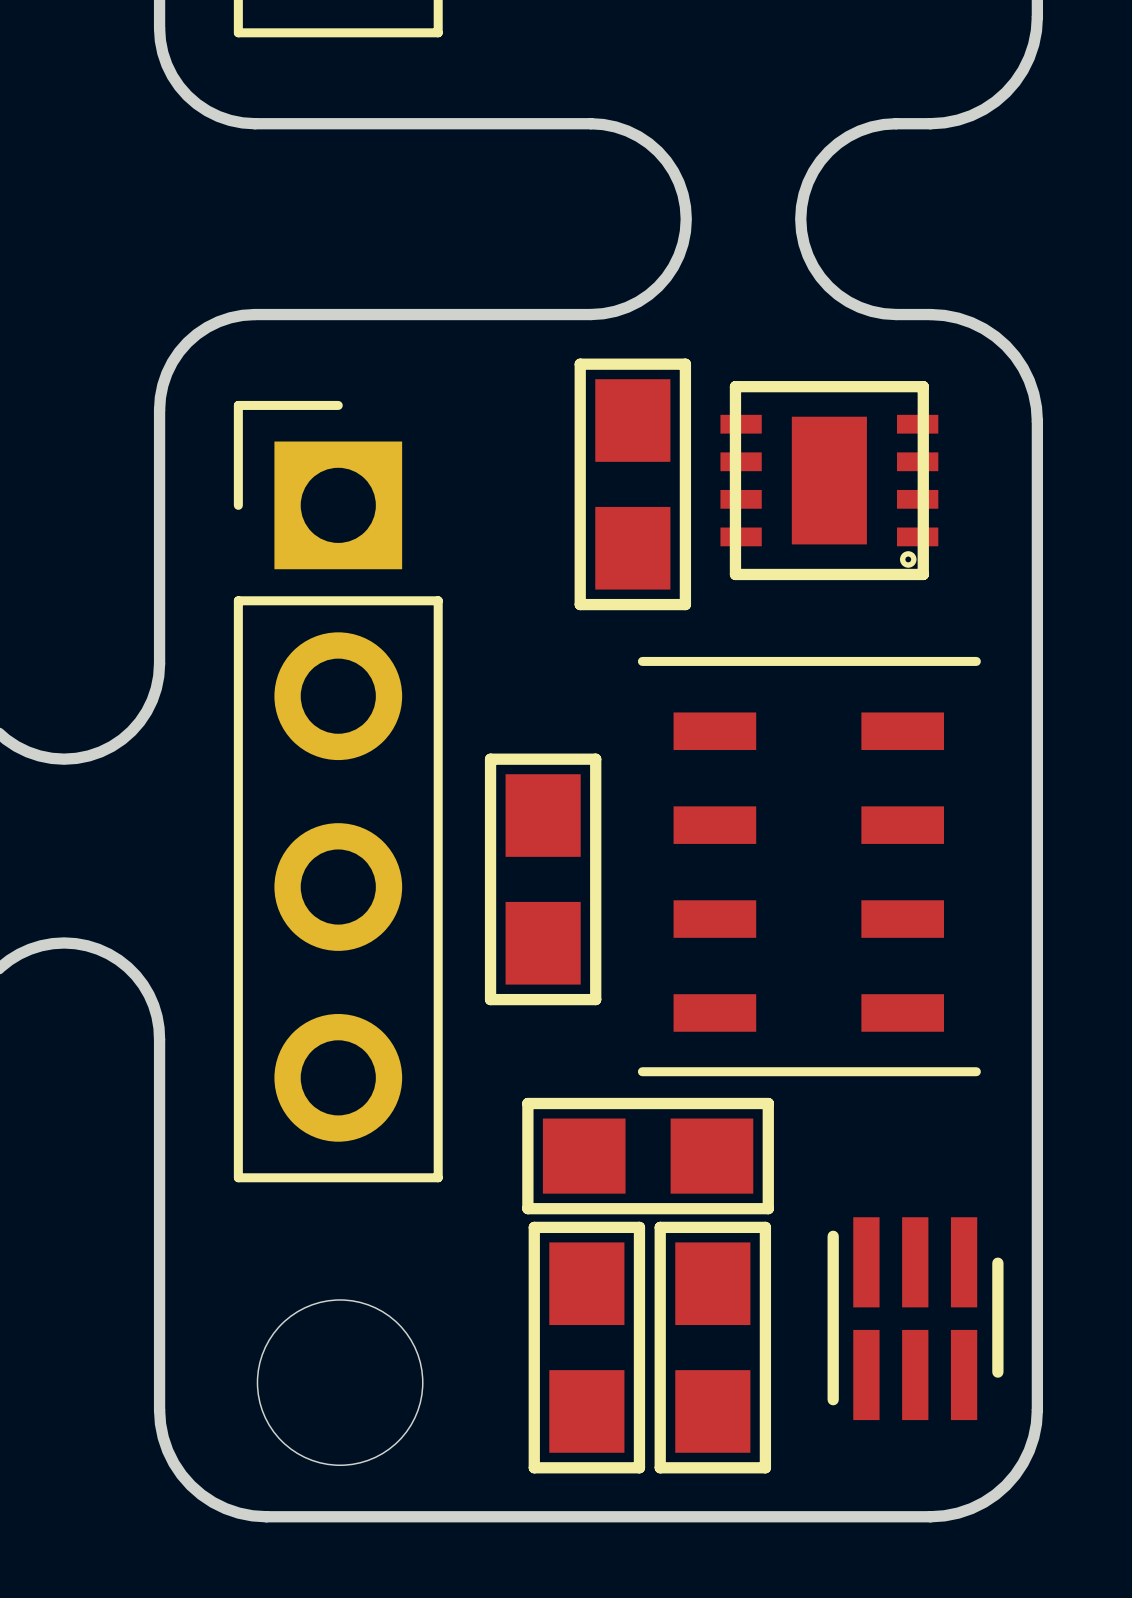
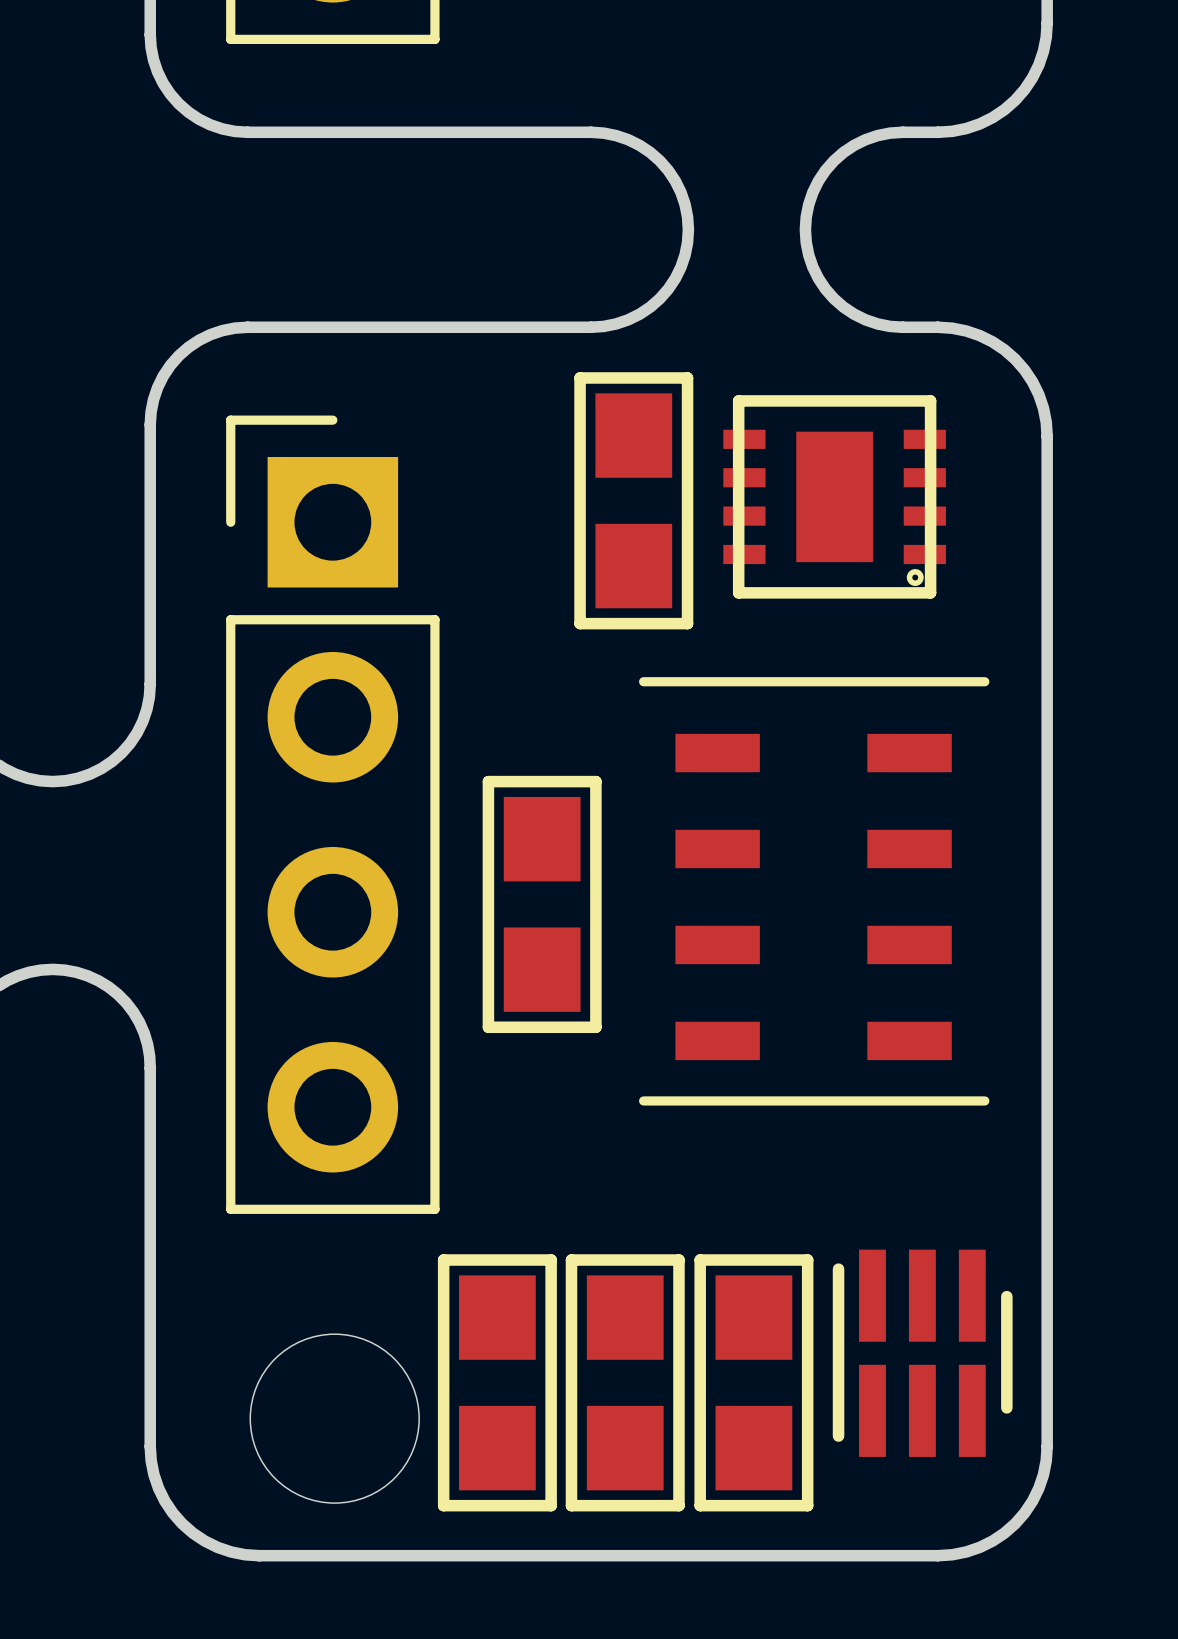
part rotation: 0° (648, 1156) -> 90° clockwise (497, 1382)
part position: (648, 1156) -> (497, 1382)
part position: (586, 1347) -> (625, 1382)
part position: (712, 1347) -> (753, 1382)

